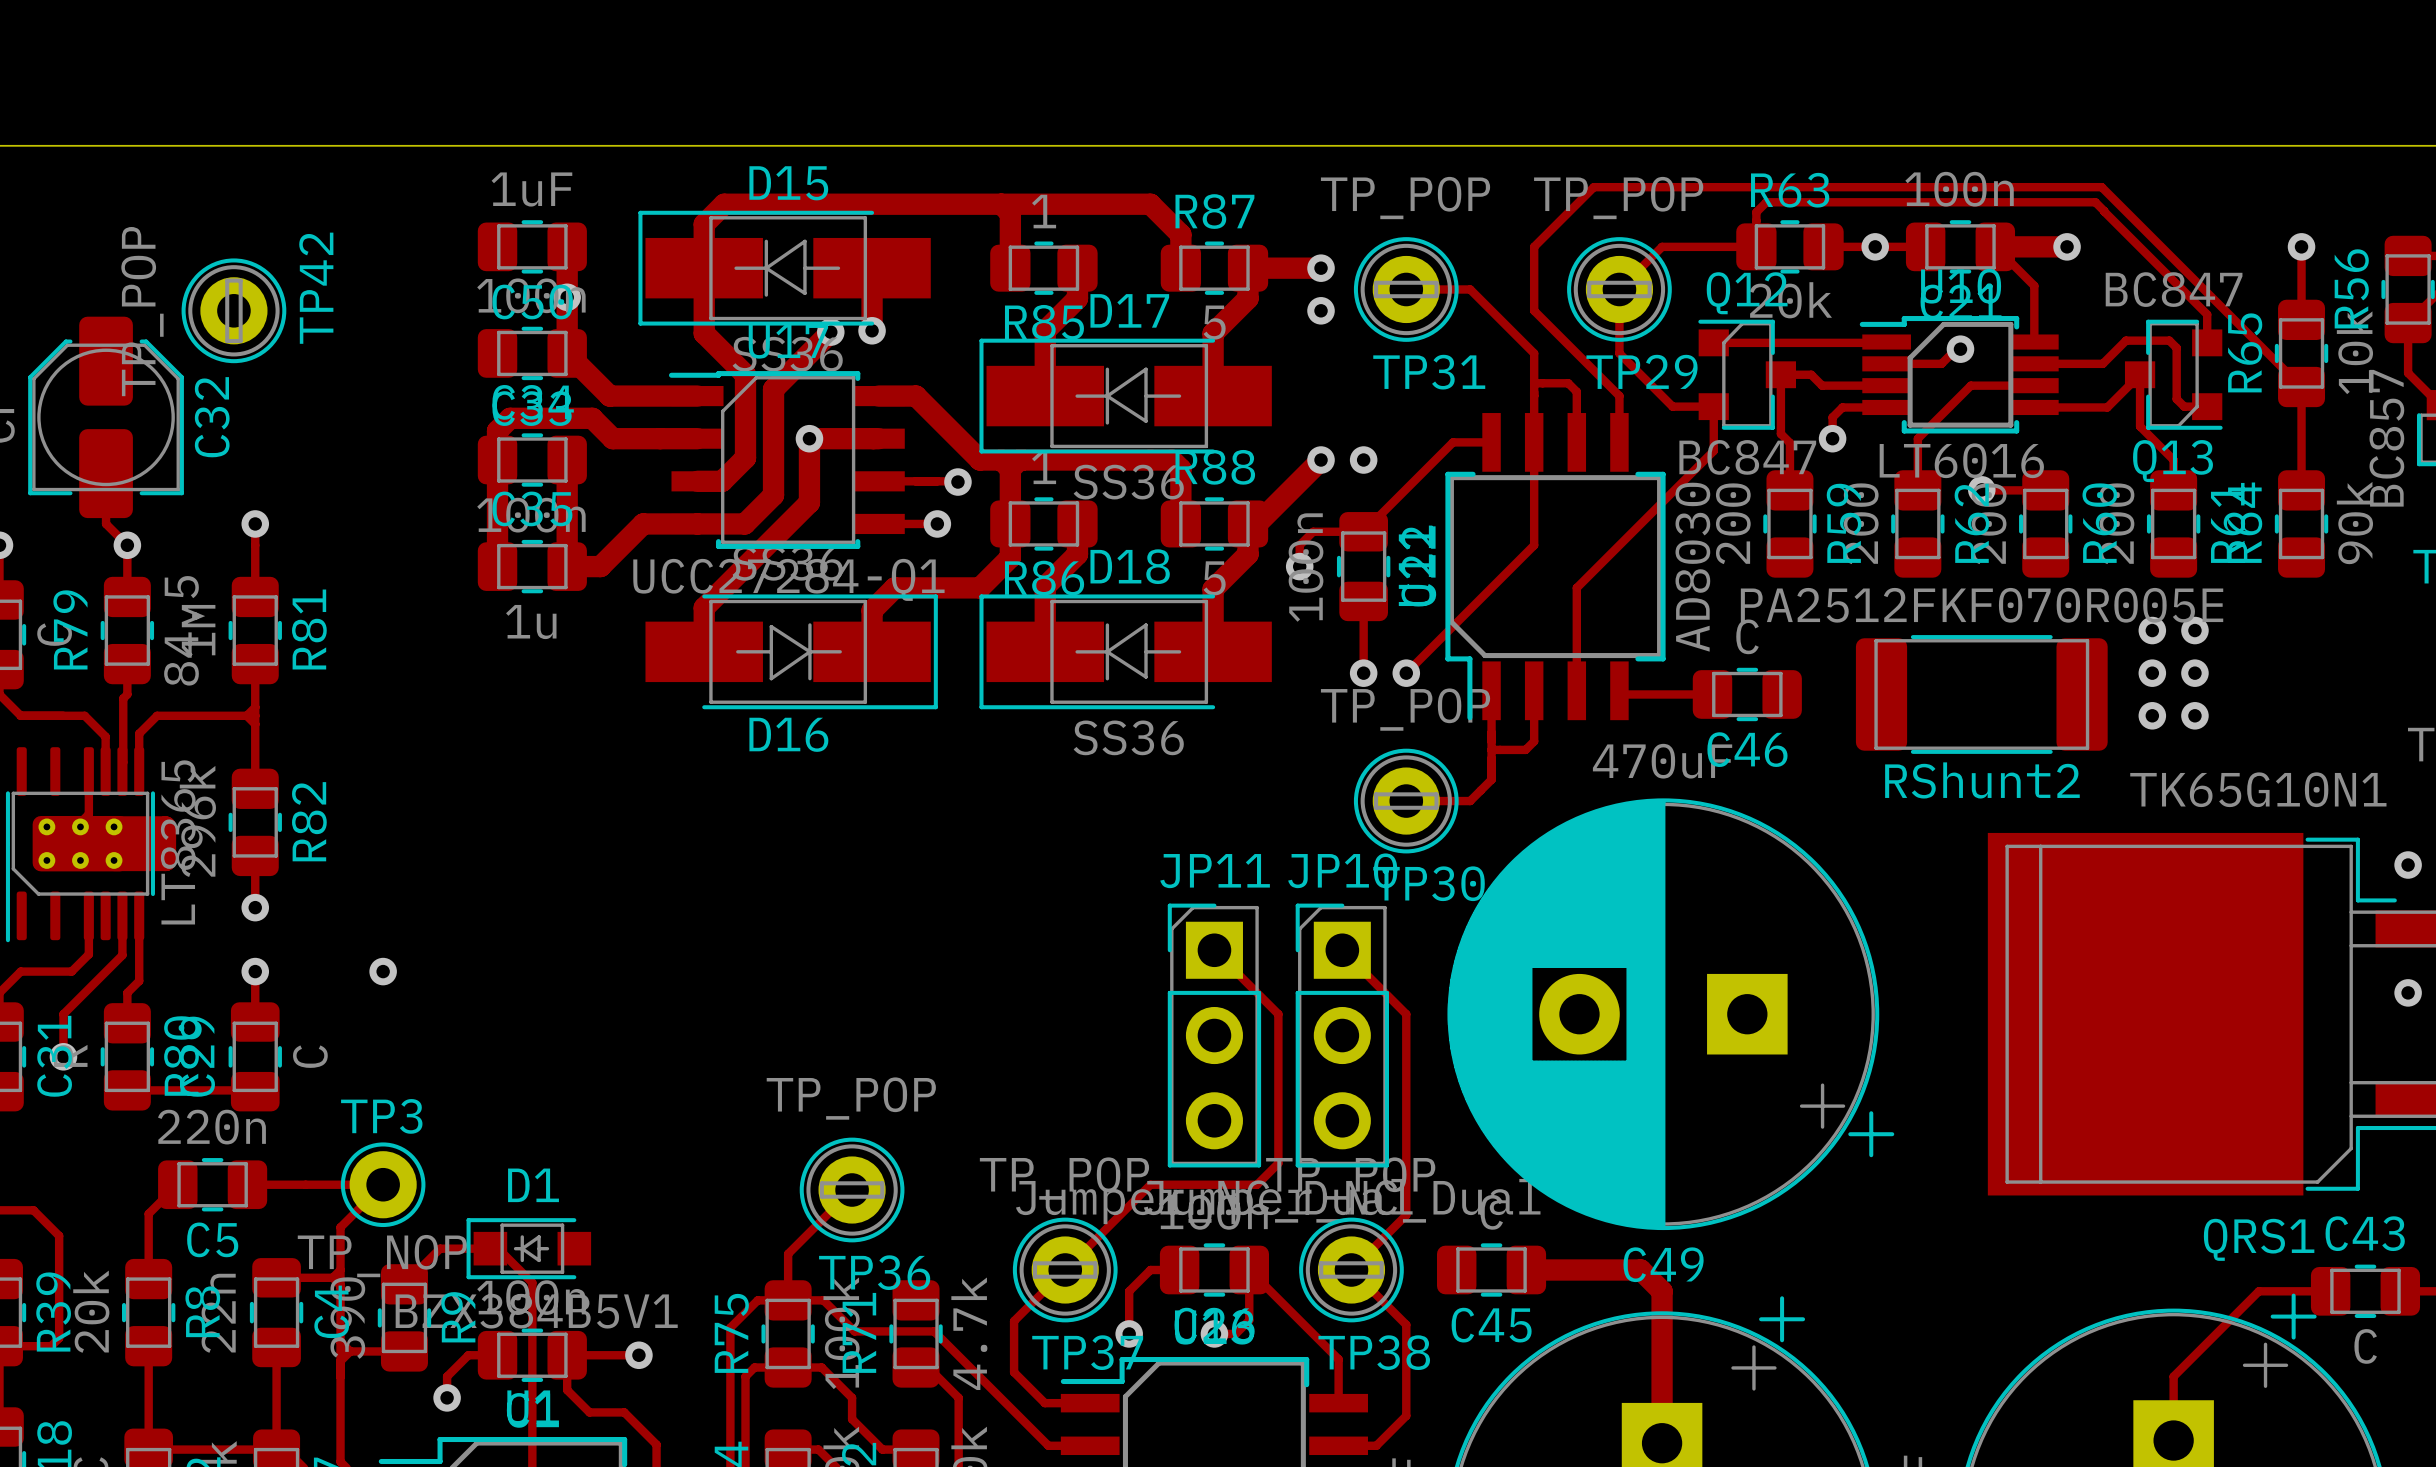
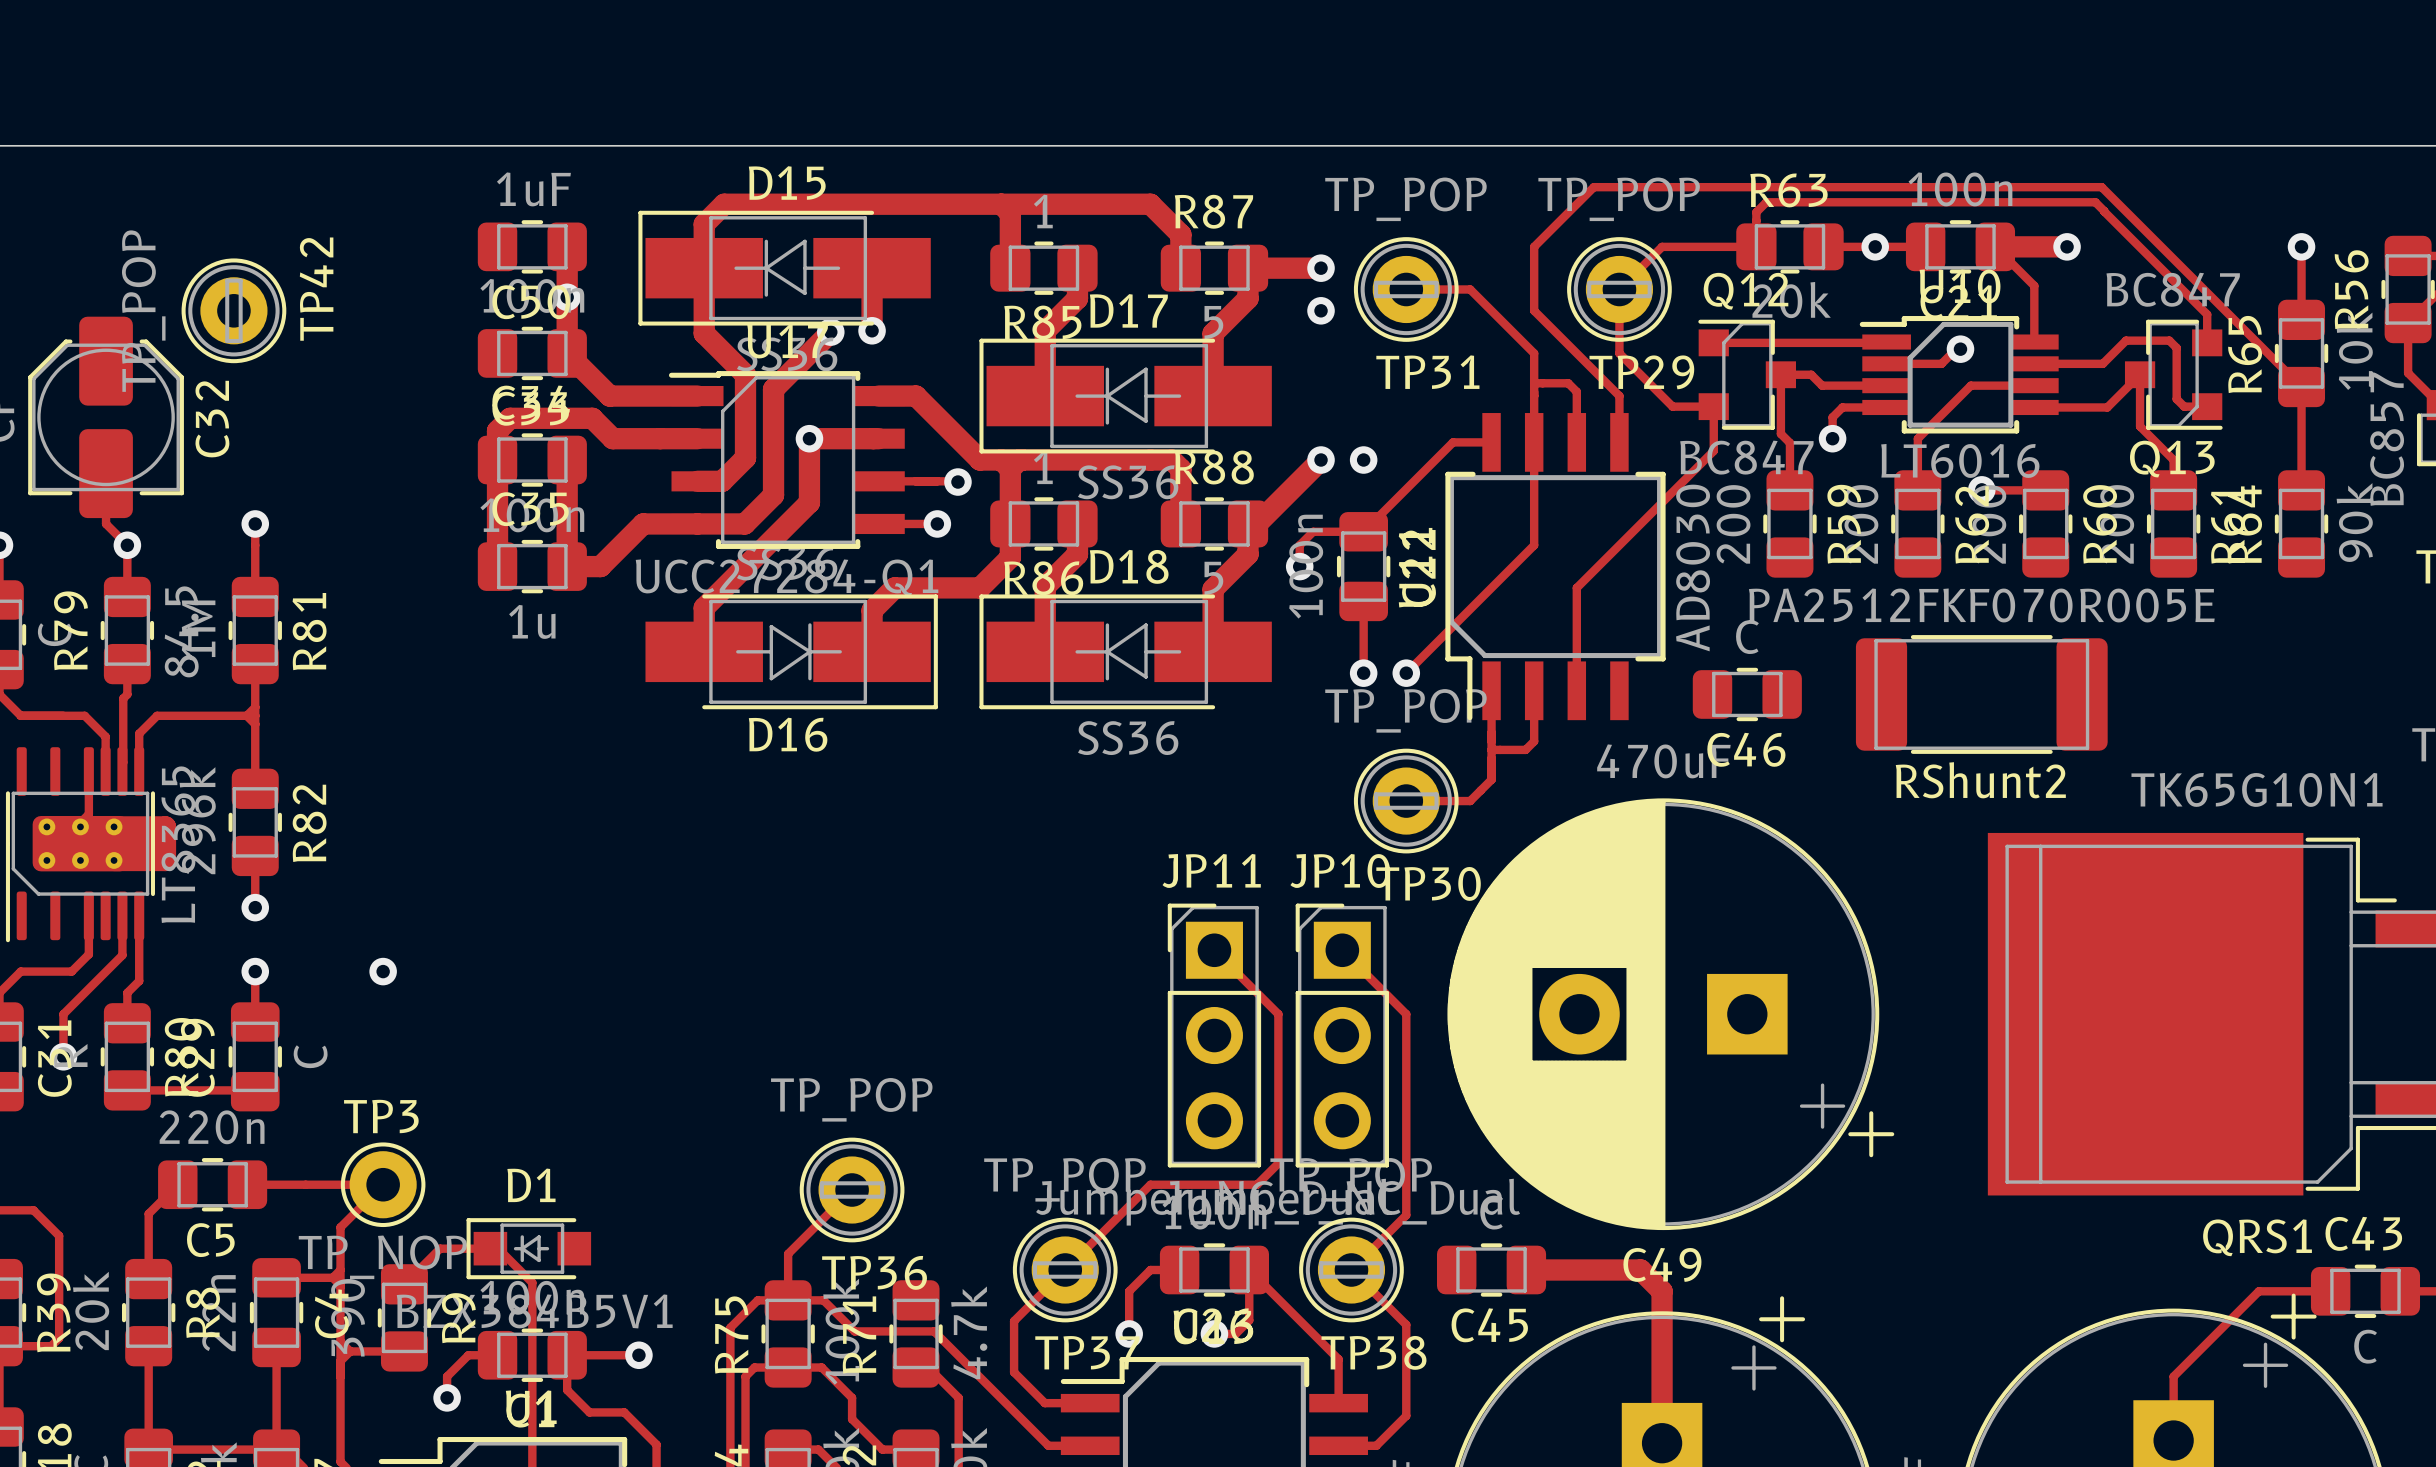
via: (2152, 630) -> none
via: (2194, 630) -> none
via: (2152, 673) -> none
via: (2194, 673) -> none
track: (1619, 690) (1623, 694) (1712, 694) -> none
via: (2152, 715) -> none
via: (2194, 715) -> none
via: (2408, 865) -> none
via: (2408, 992) -> none

